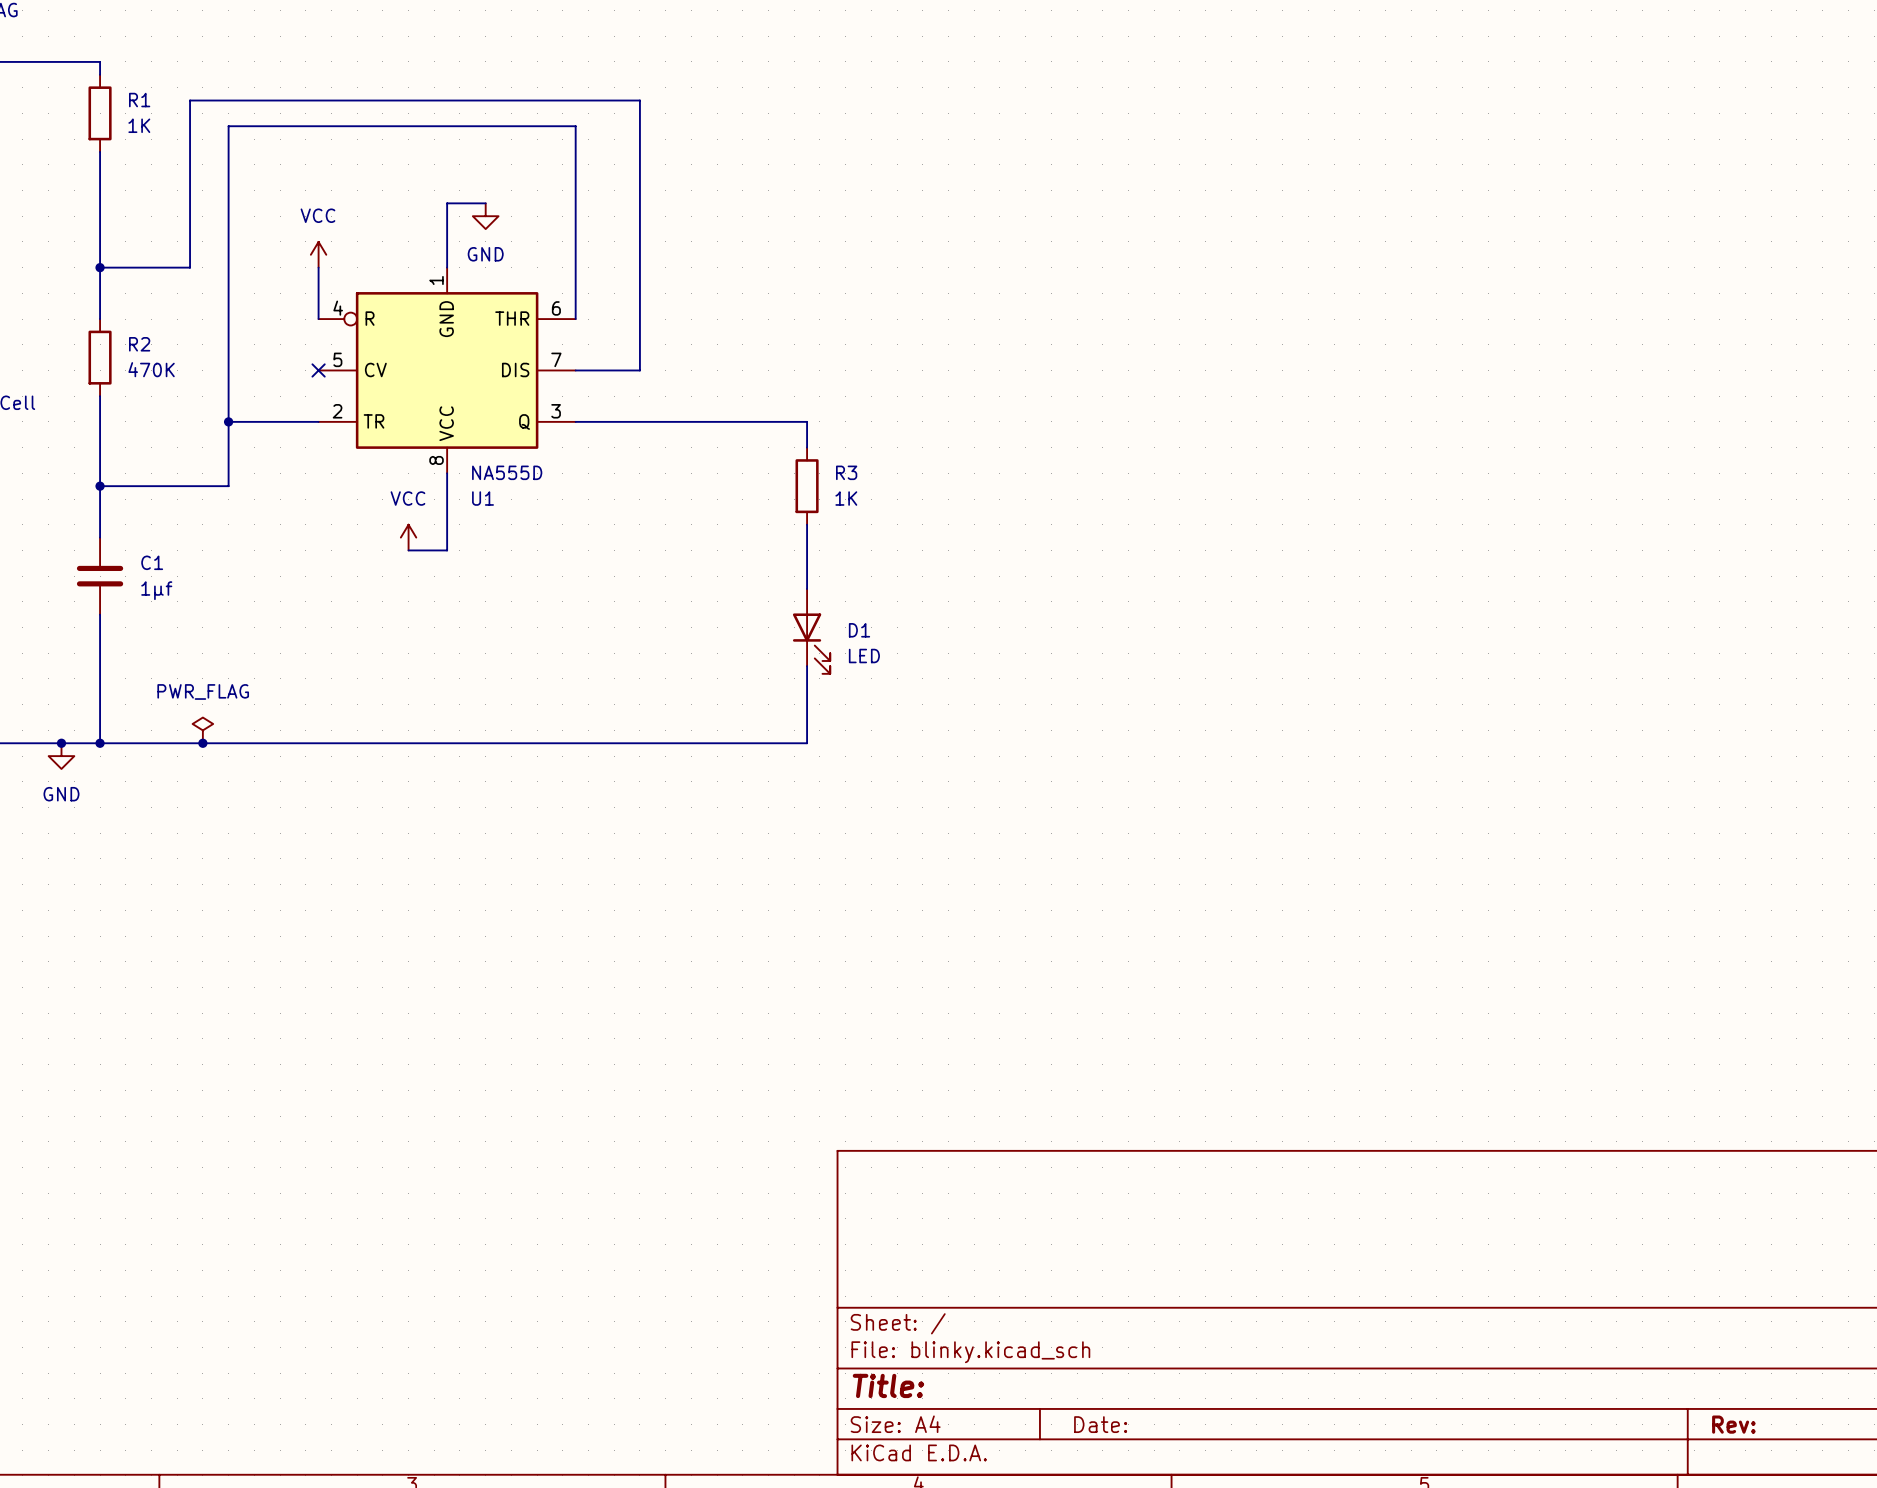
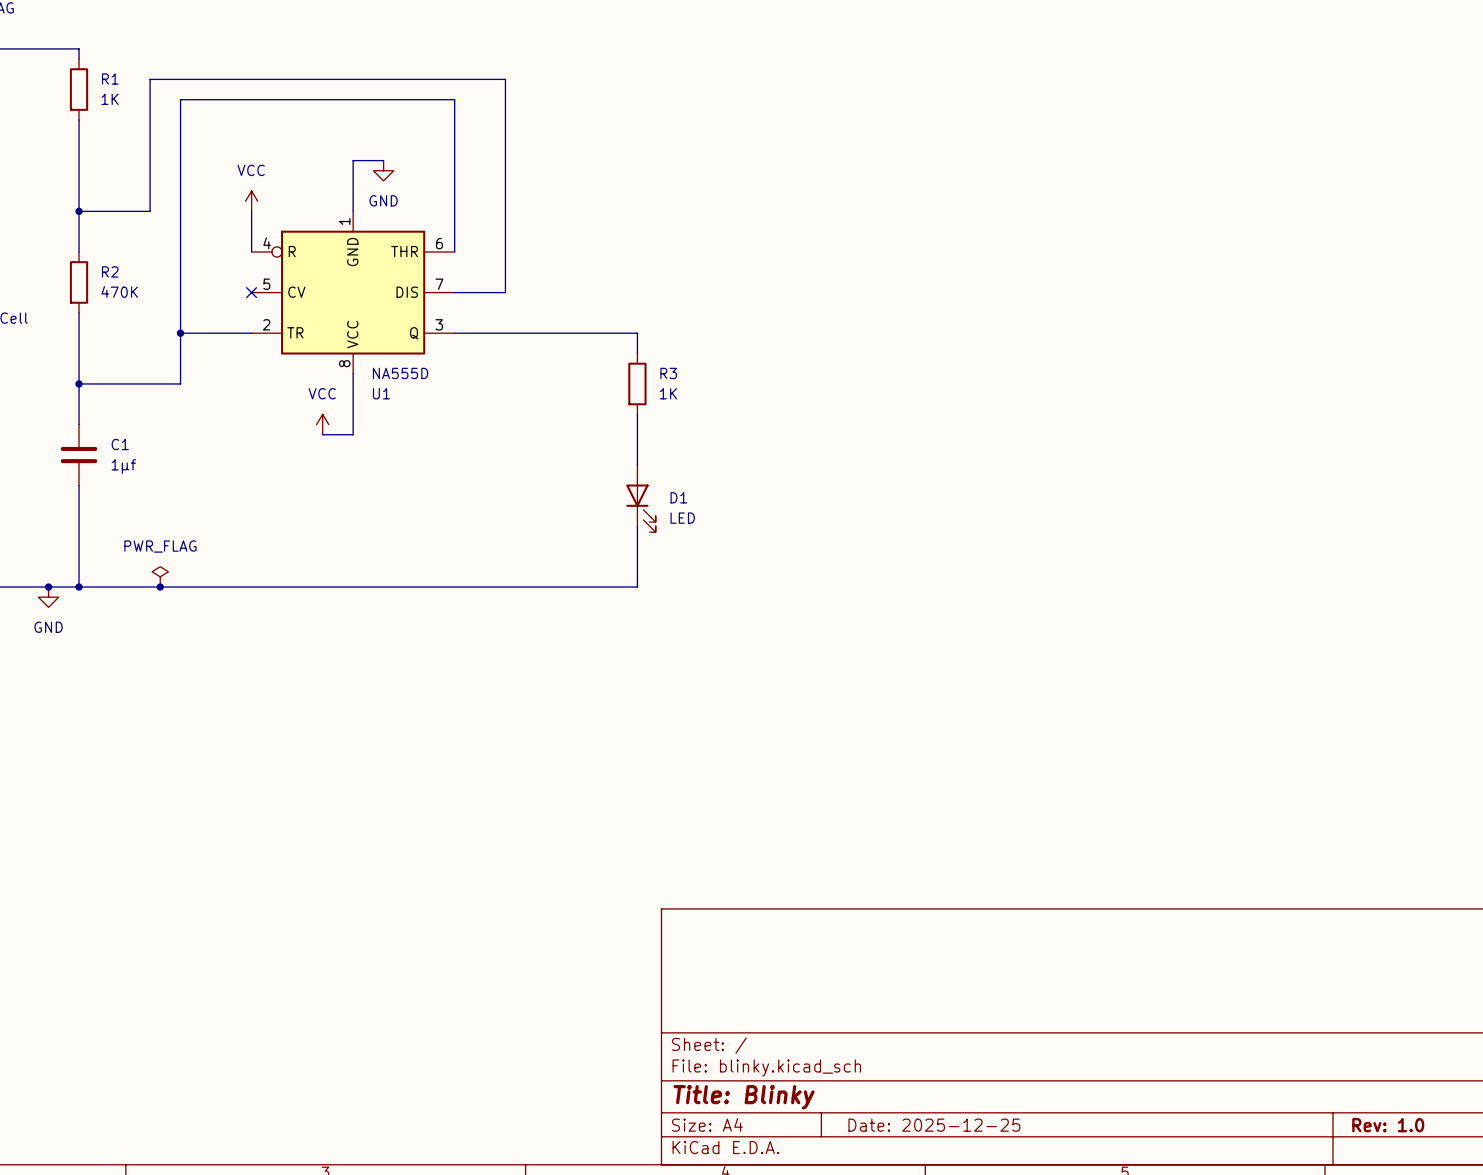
title block: Title: (888, 1385) -> Title: Blinky (744, 1097)
title block: Date: (1100, 1424) -> Date: 2025-12-25 (934, 1125)
title block: Rev: (1733, 1424) -> Rev: 1.0 (1388, 1125)

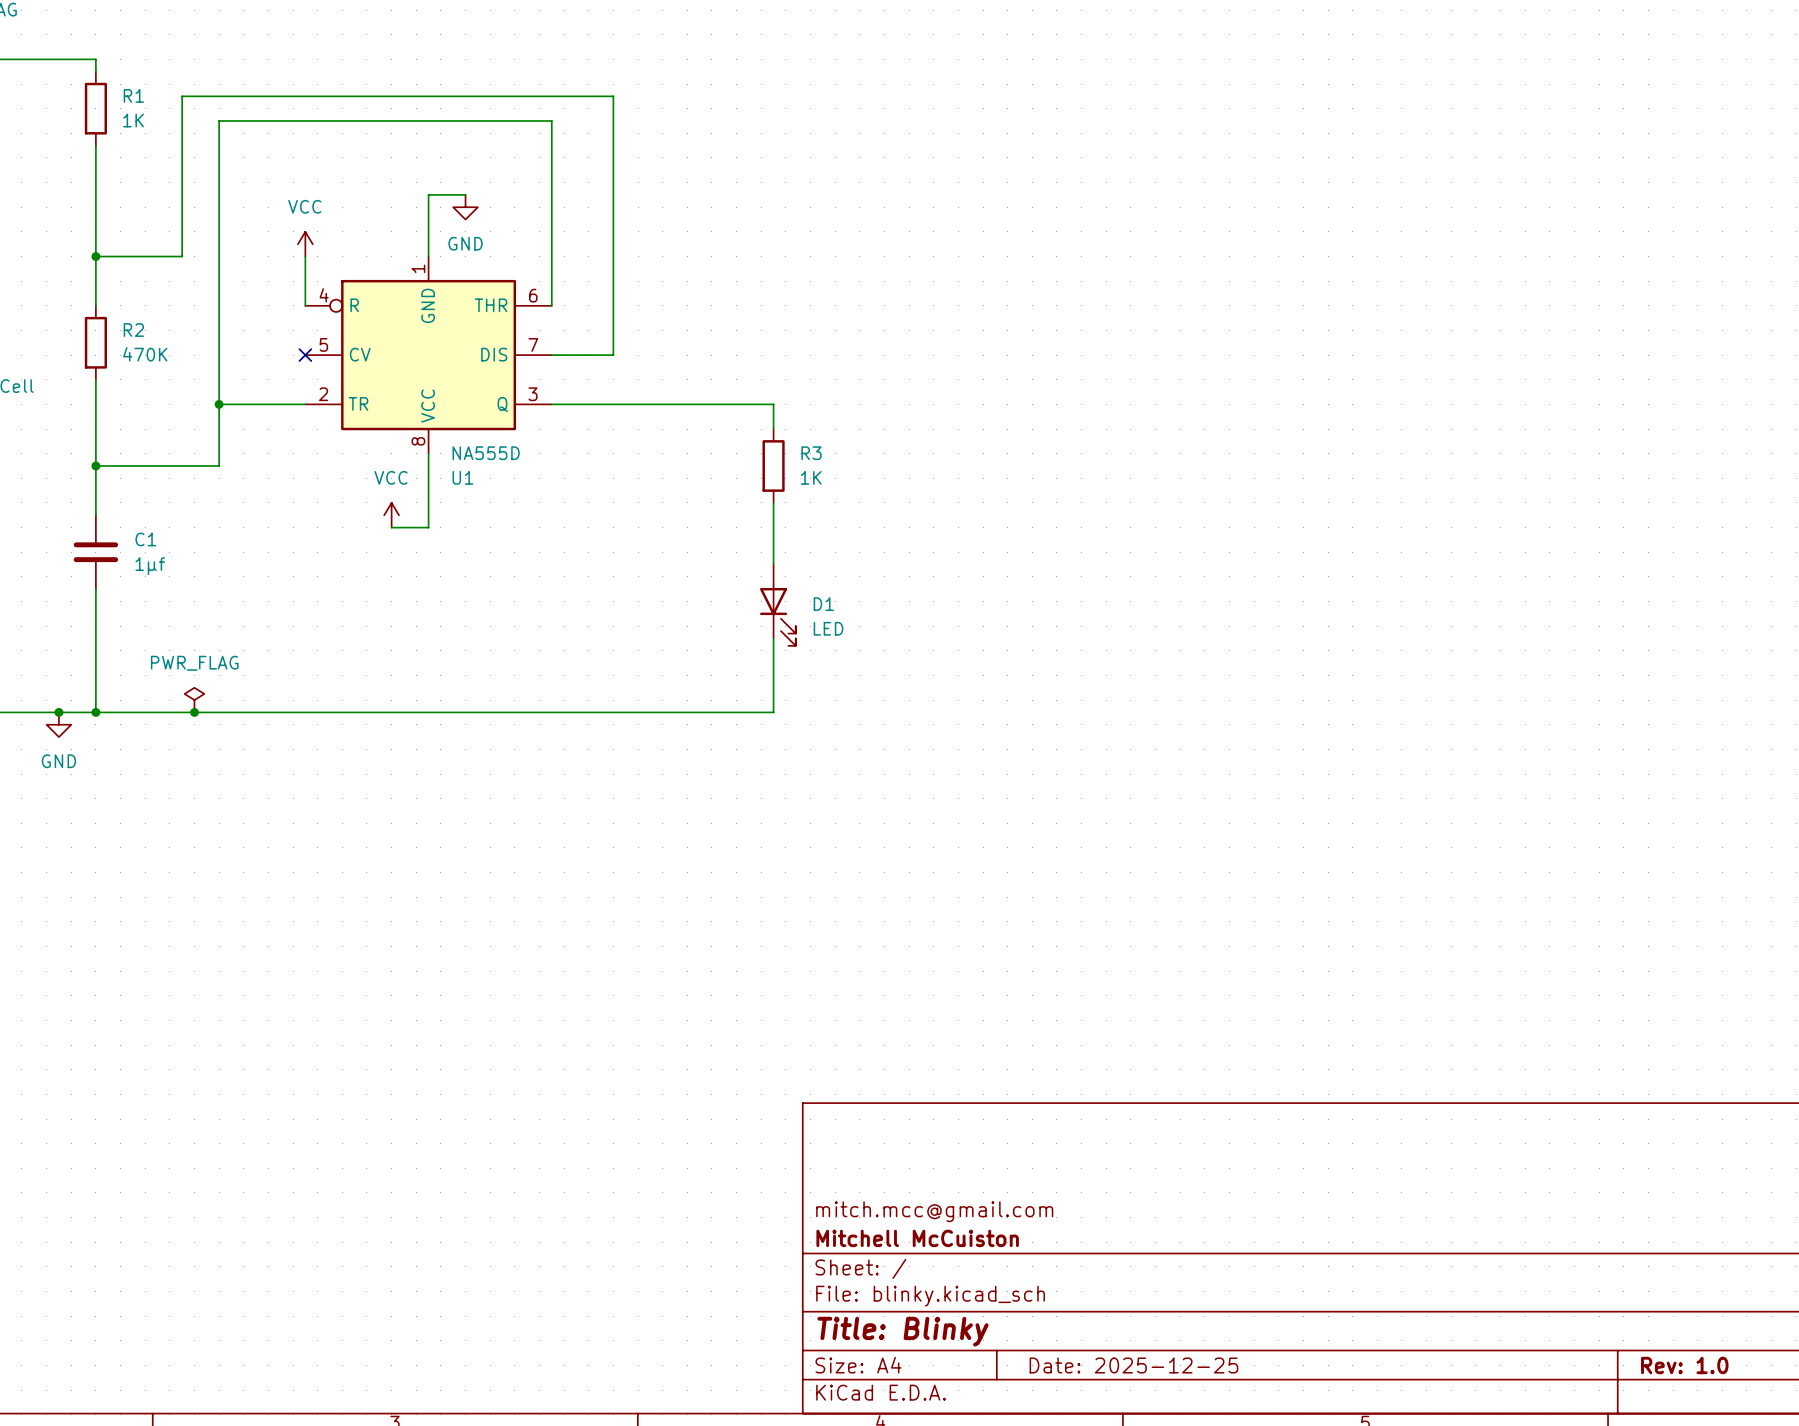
title block: none -> mitch.mcc@gmail.com (934, 1211)
title block: none -> Mitchell McCuiston (917, 1238)

